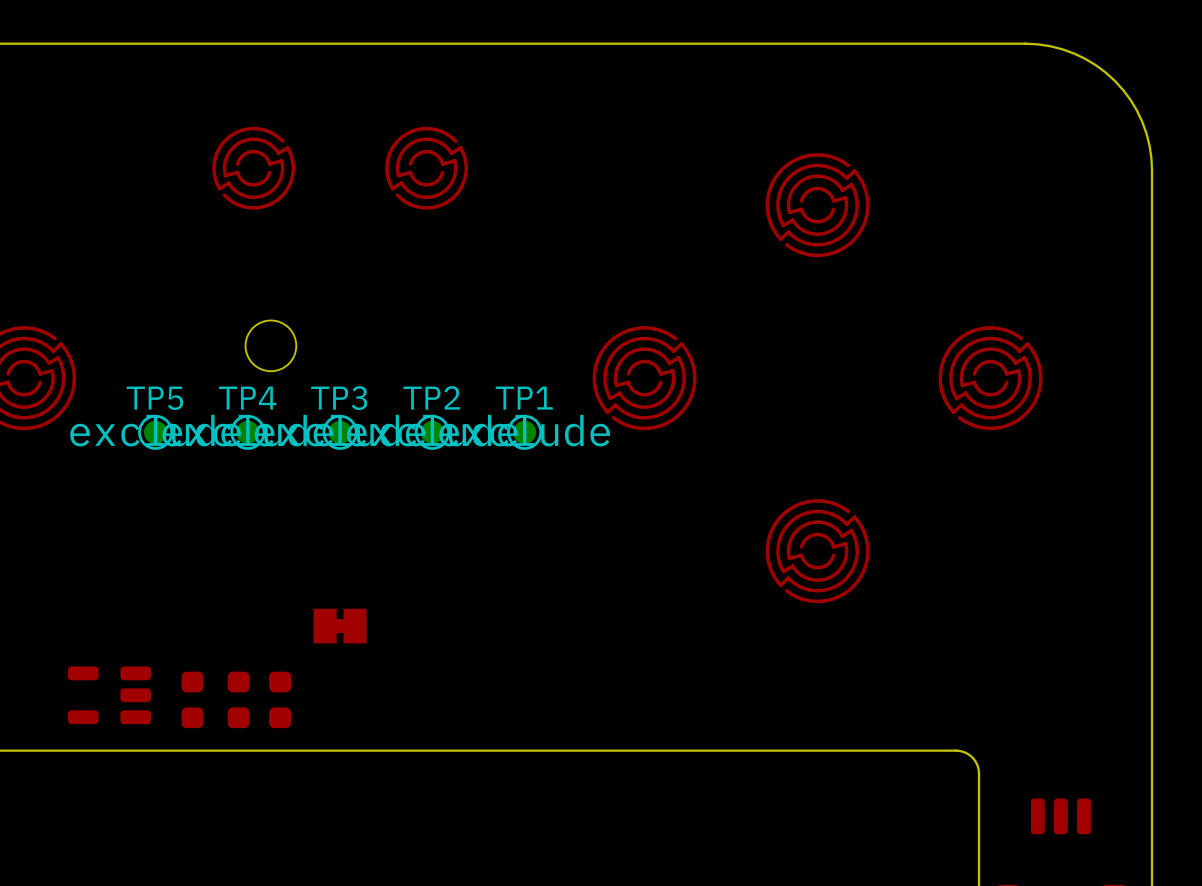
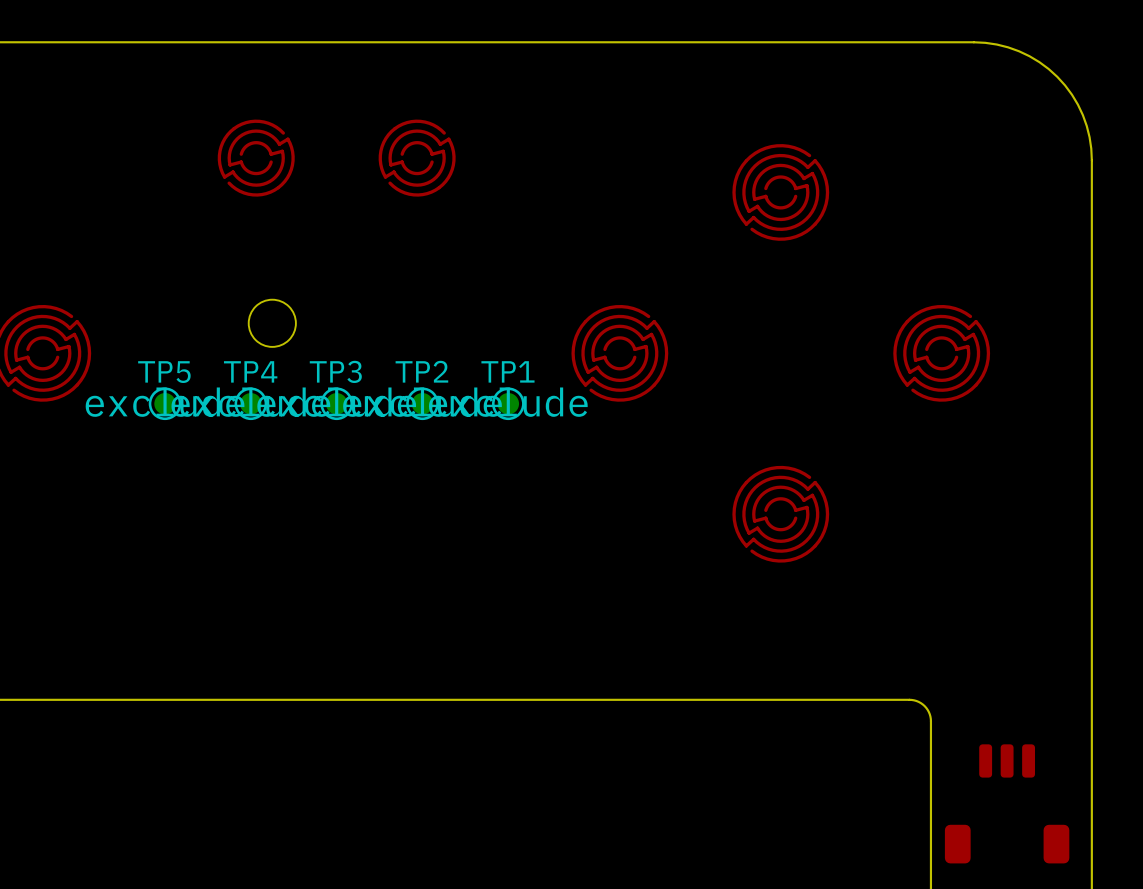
part: (340, 626) -> none
part: (109, 695) -> none
part: (192, 699) -> none
part: (238, 699) -> none
part: (280, 699) -> none

